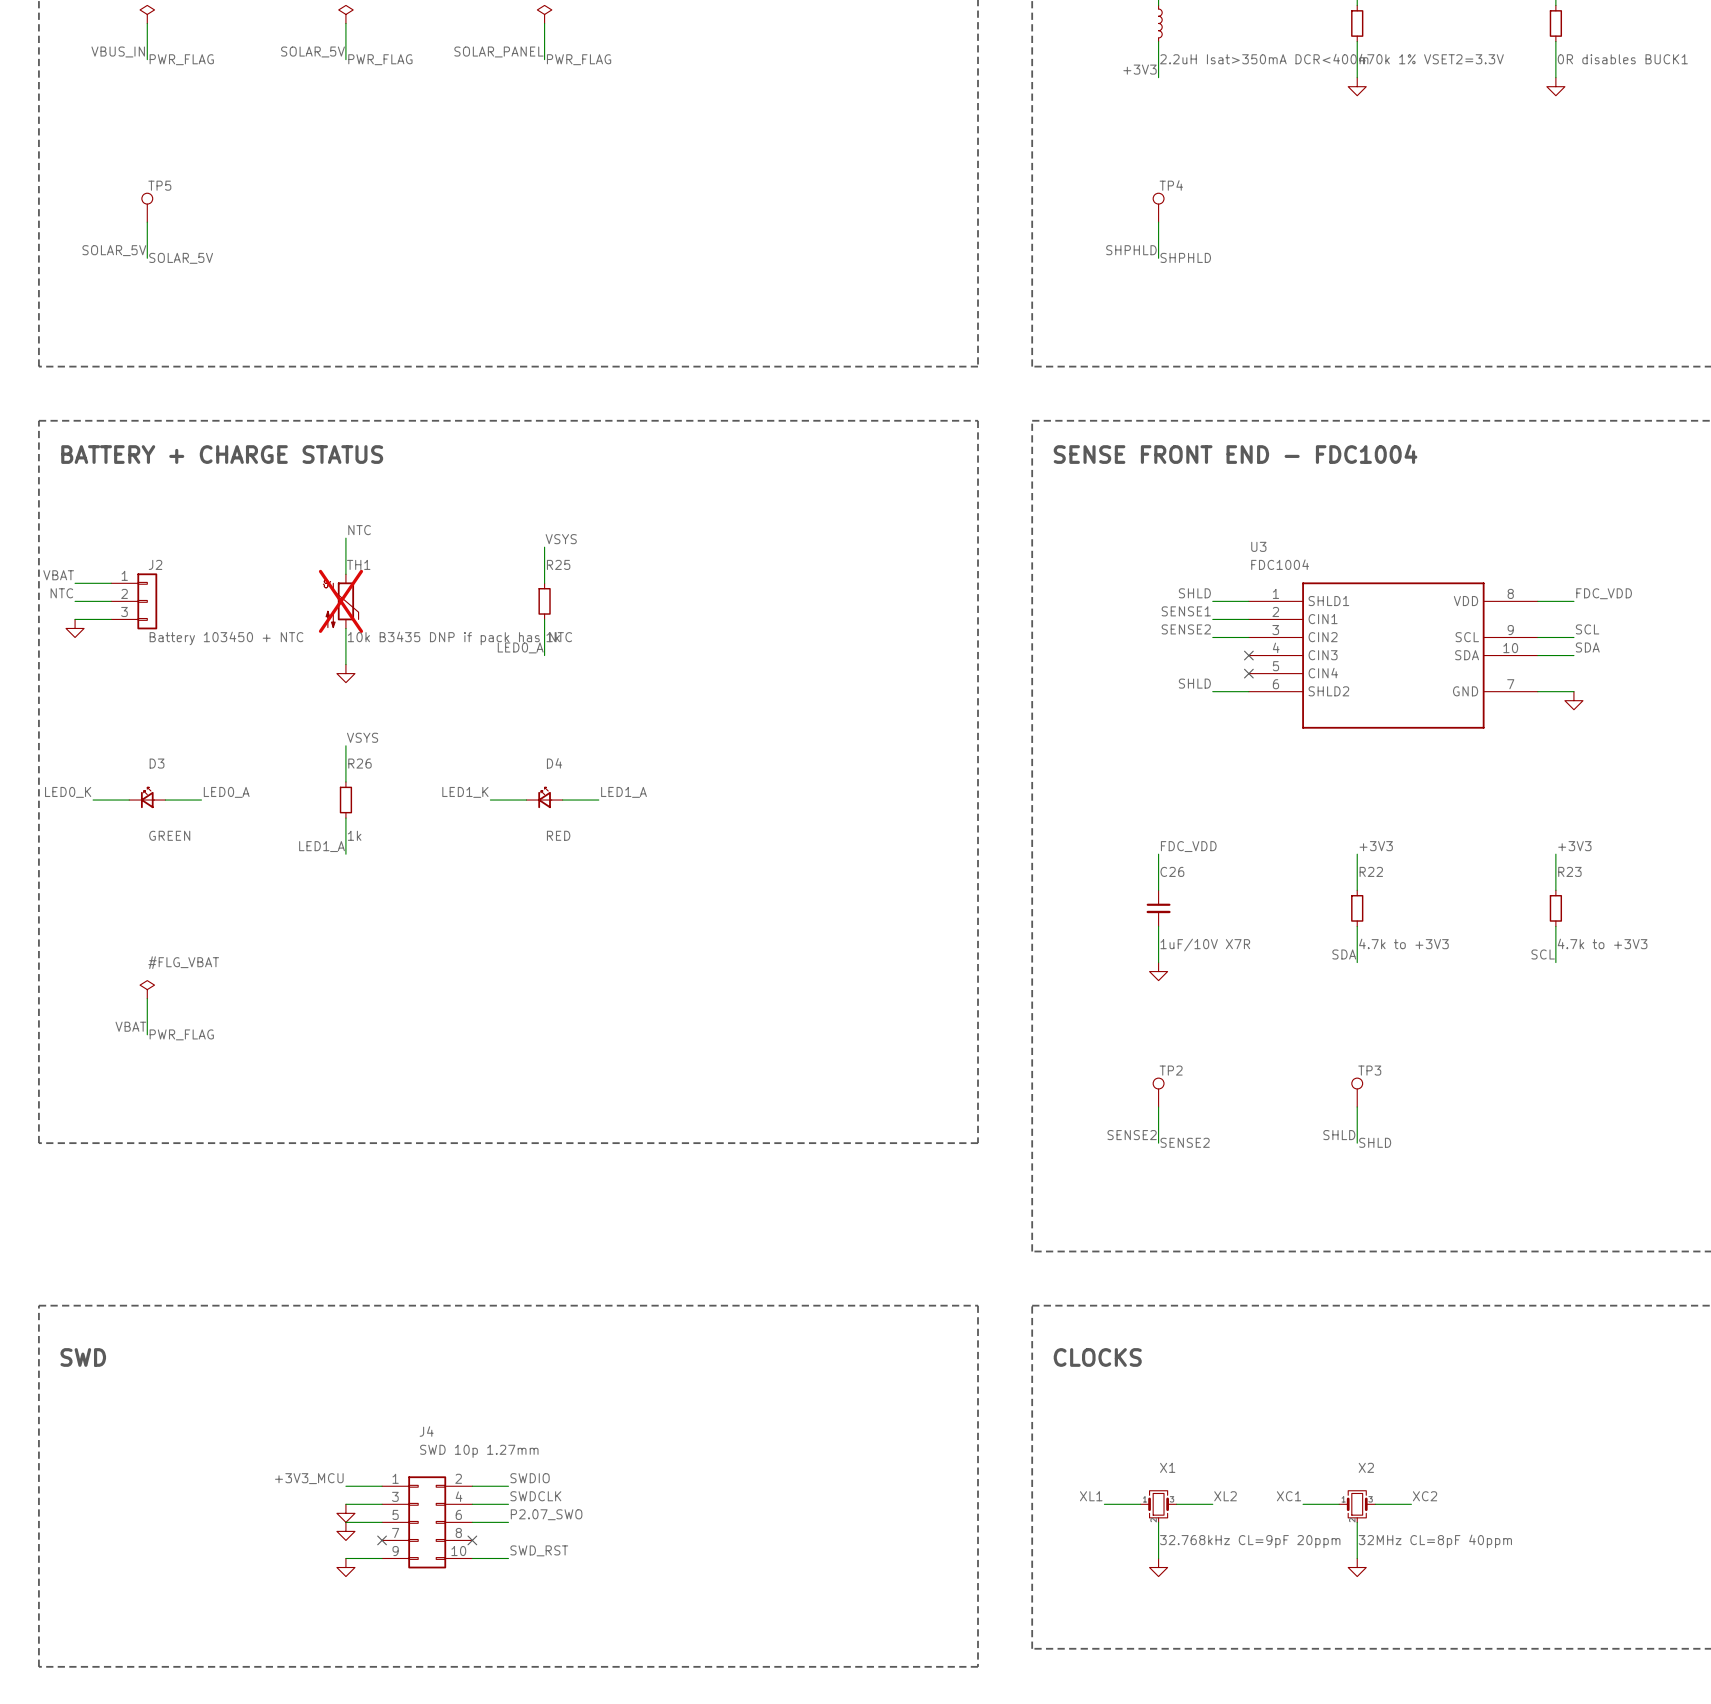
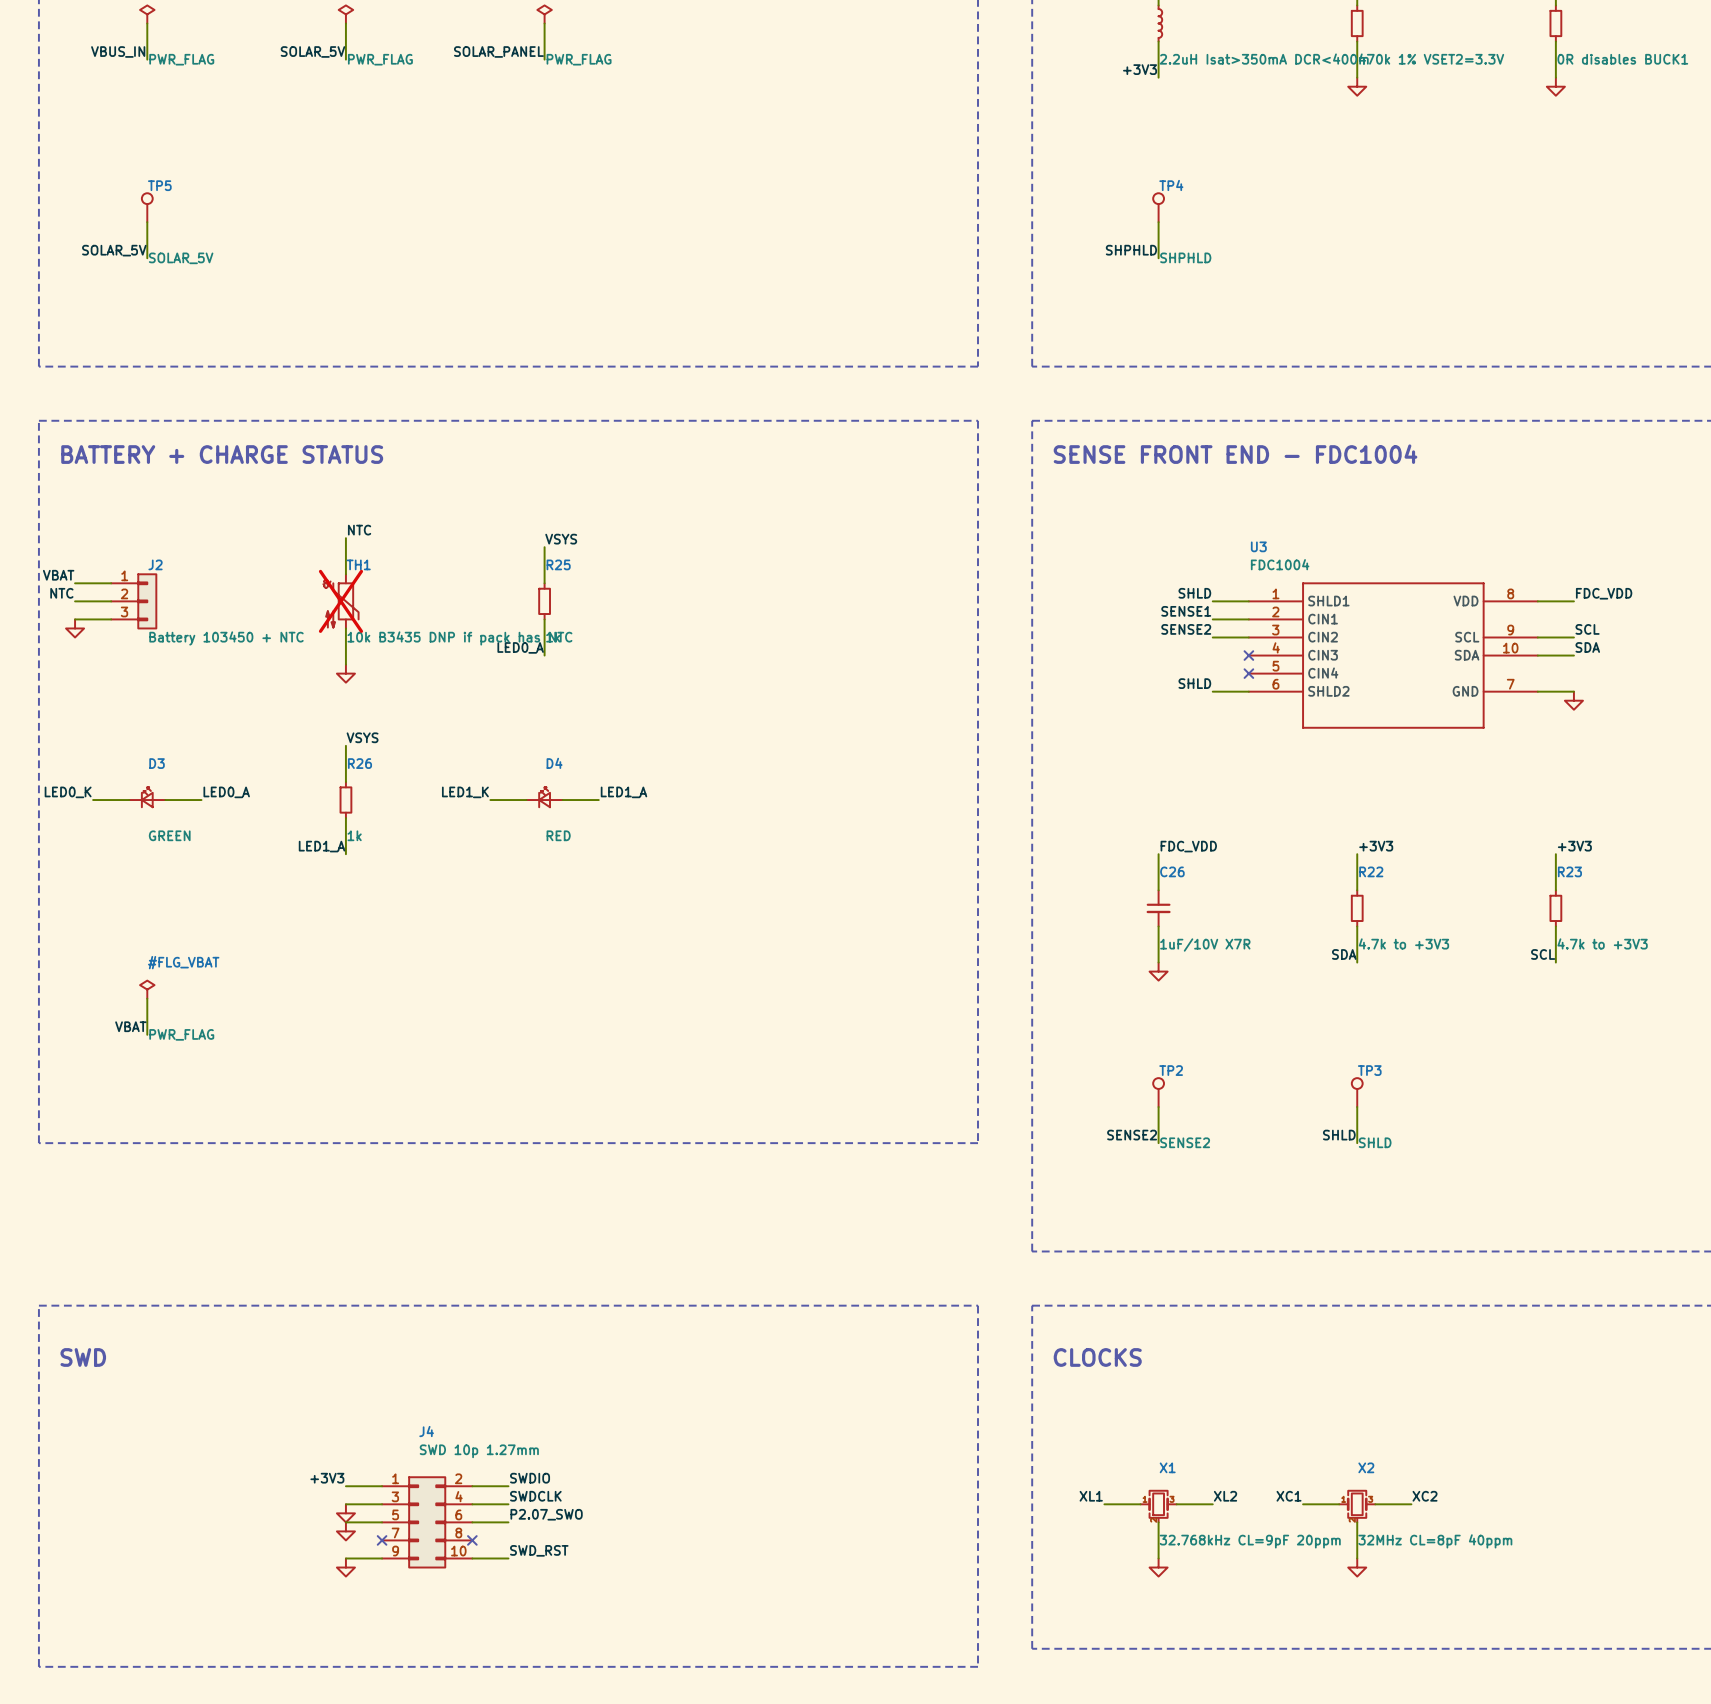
label: +3V3_MCU (309, 1478) -> +3V3 (327, 1478)

